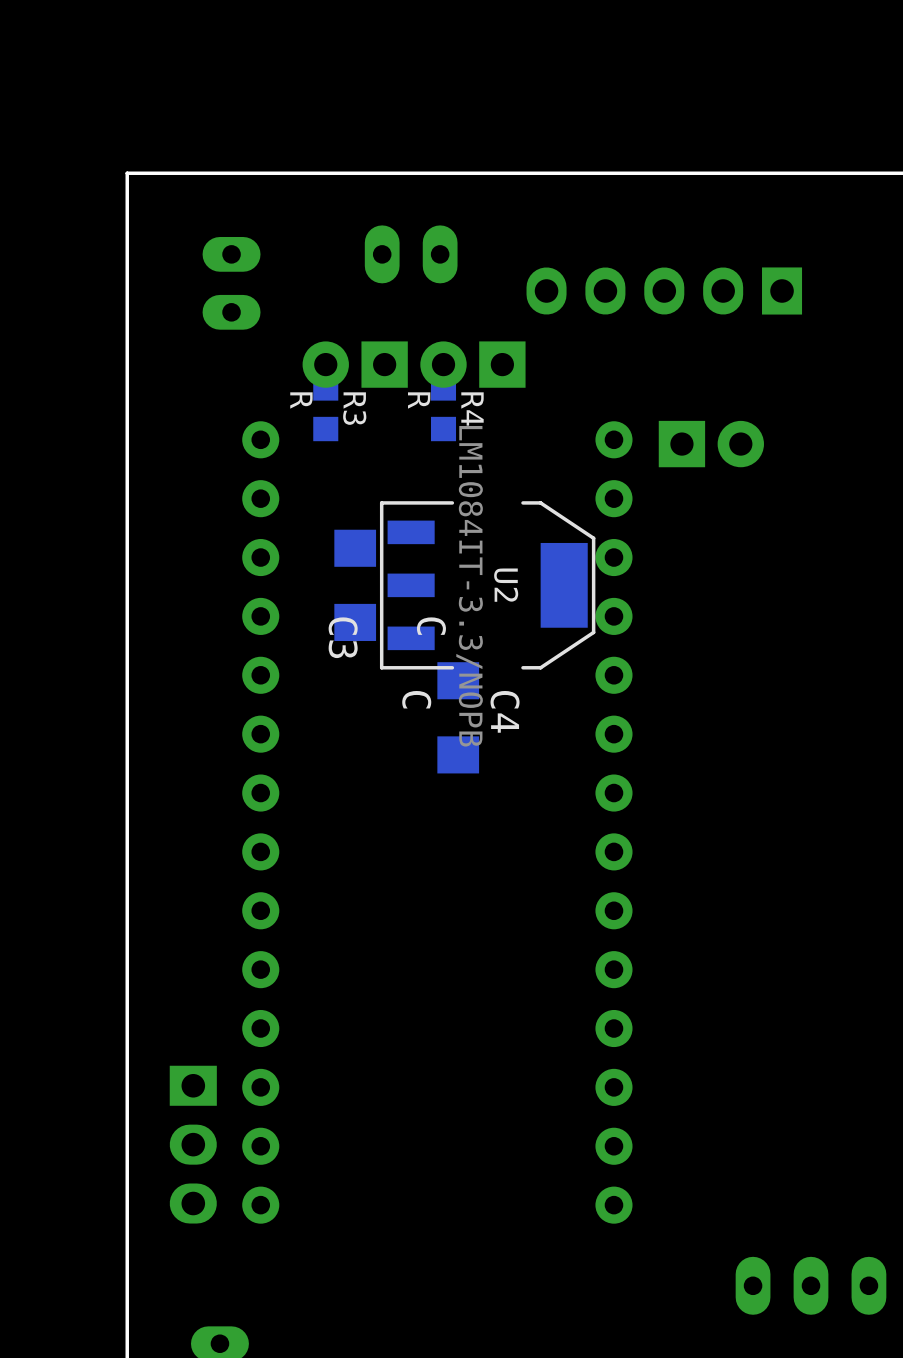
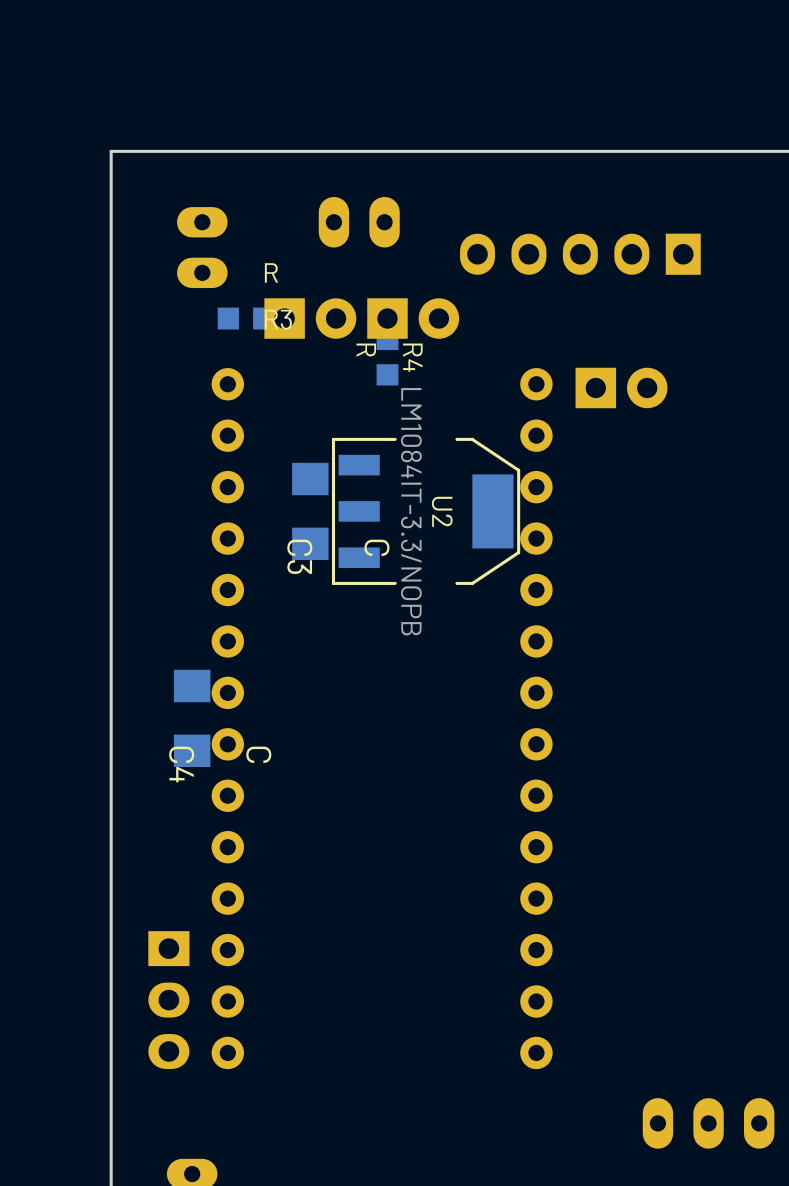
part rotation: 0° (355, 364) -> 180° (310, 318)
part rotation: 0° (472, 364) -> 180° (413, 318)
R3 rotation: 0° (325, 408) -> 90° clockwise (246, 318)
R3 position: (325, 408) -> (246, 318)
C4 value position: C (416, 699) -> C (258, 754)
C4 name position: C4 (505, 711) -> C4 (181, 764)
C4 position: (458, 717) -> (192, 718)

